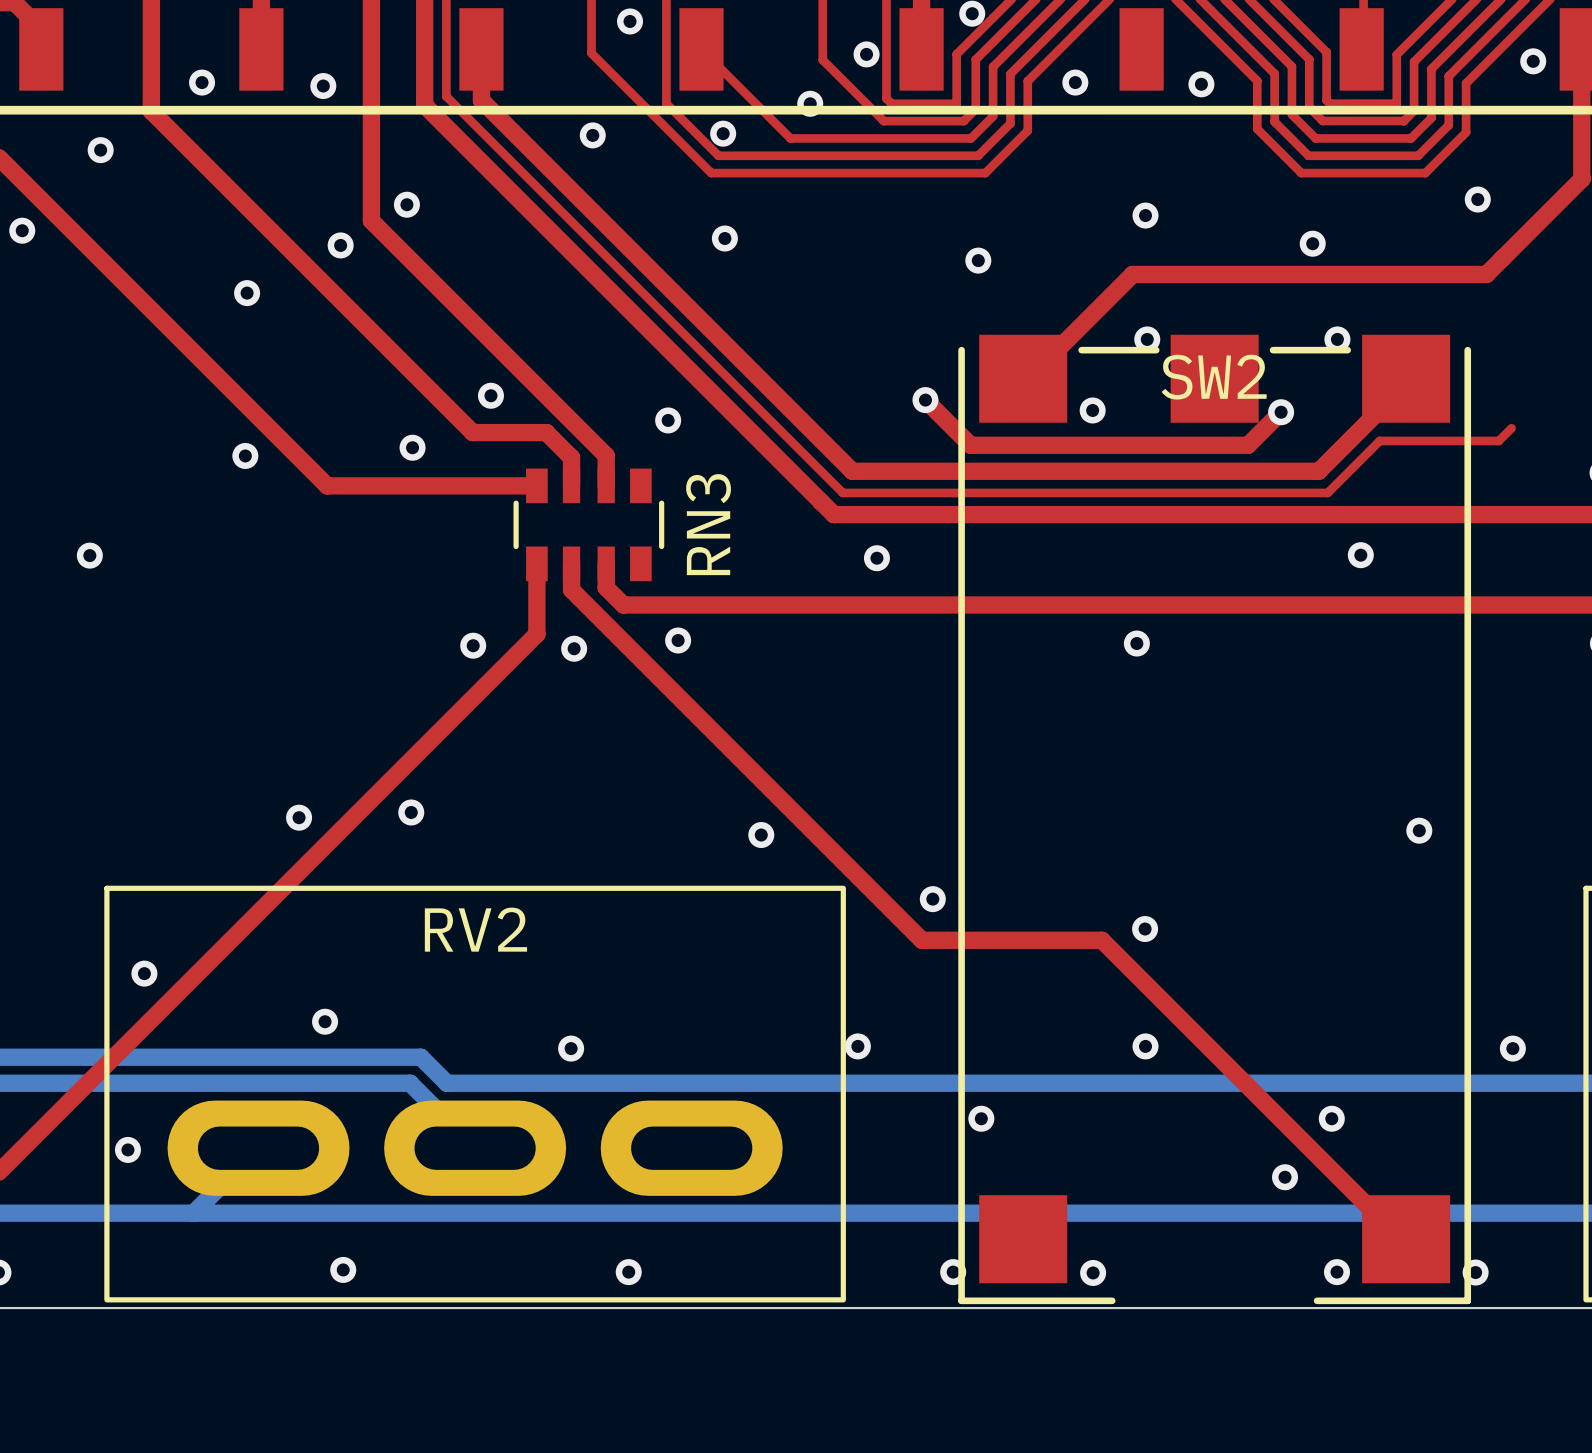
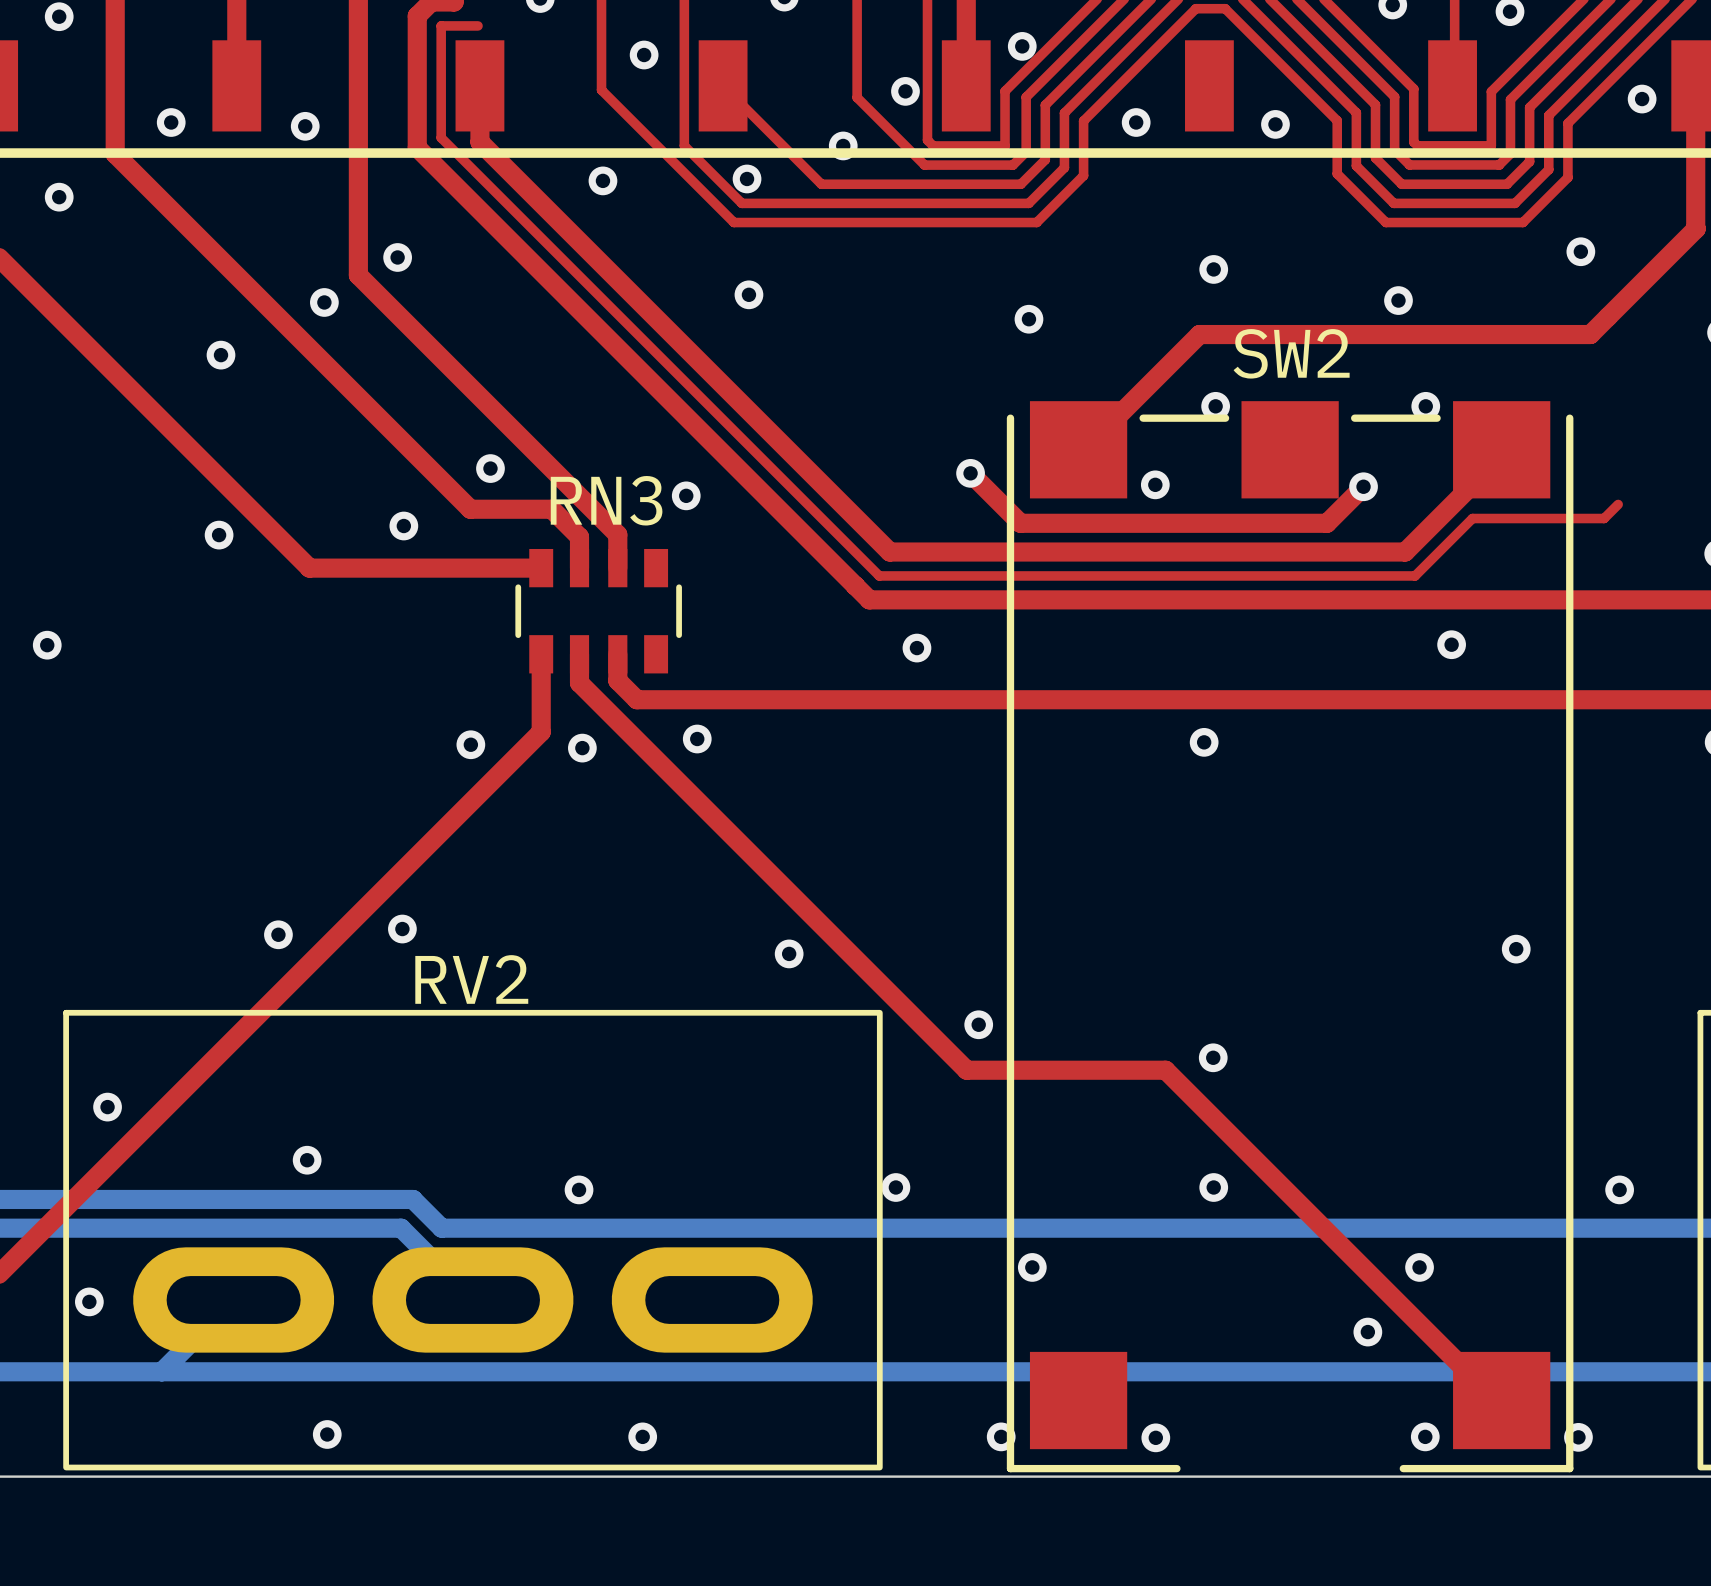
SW2 name position: SW2 (1214, 377) -> SW2 (1291, 353)
RN3 name rotation: 0° (708, 524) -> 90° clockwise (606, 500)
RV2 name position: RV2 (475, 929) -> RV2 (471, 979)

